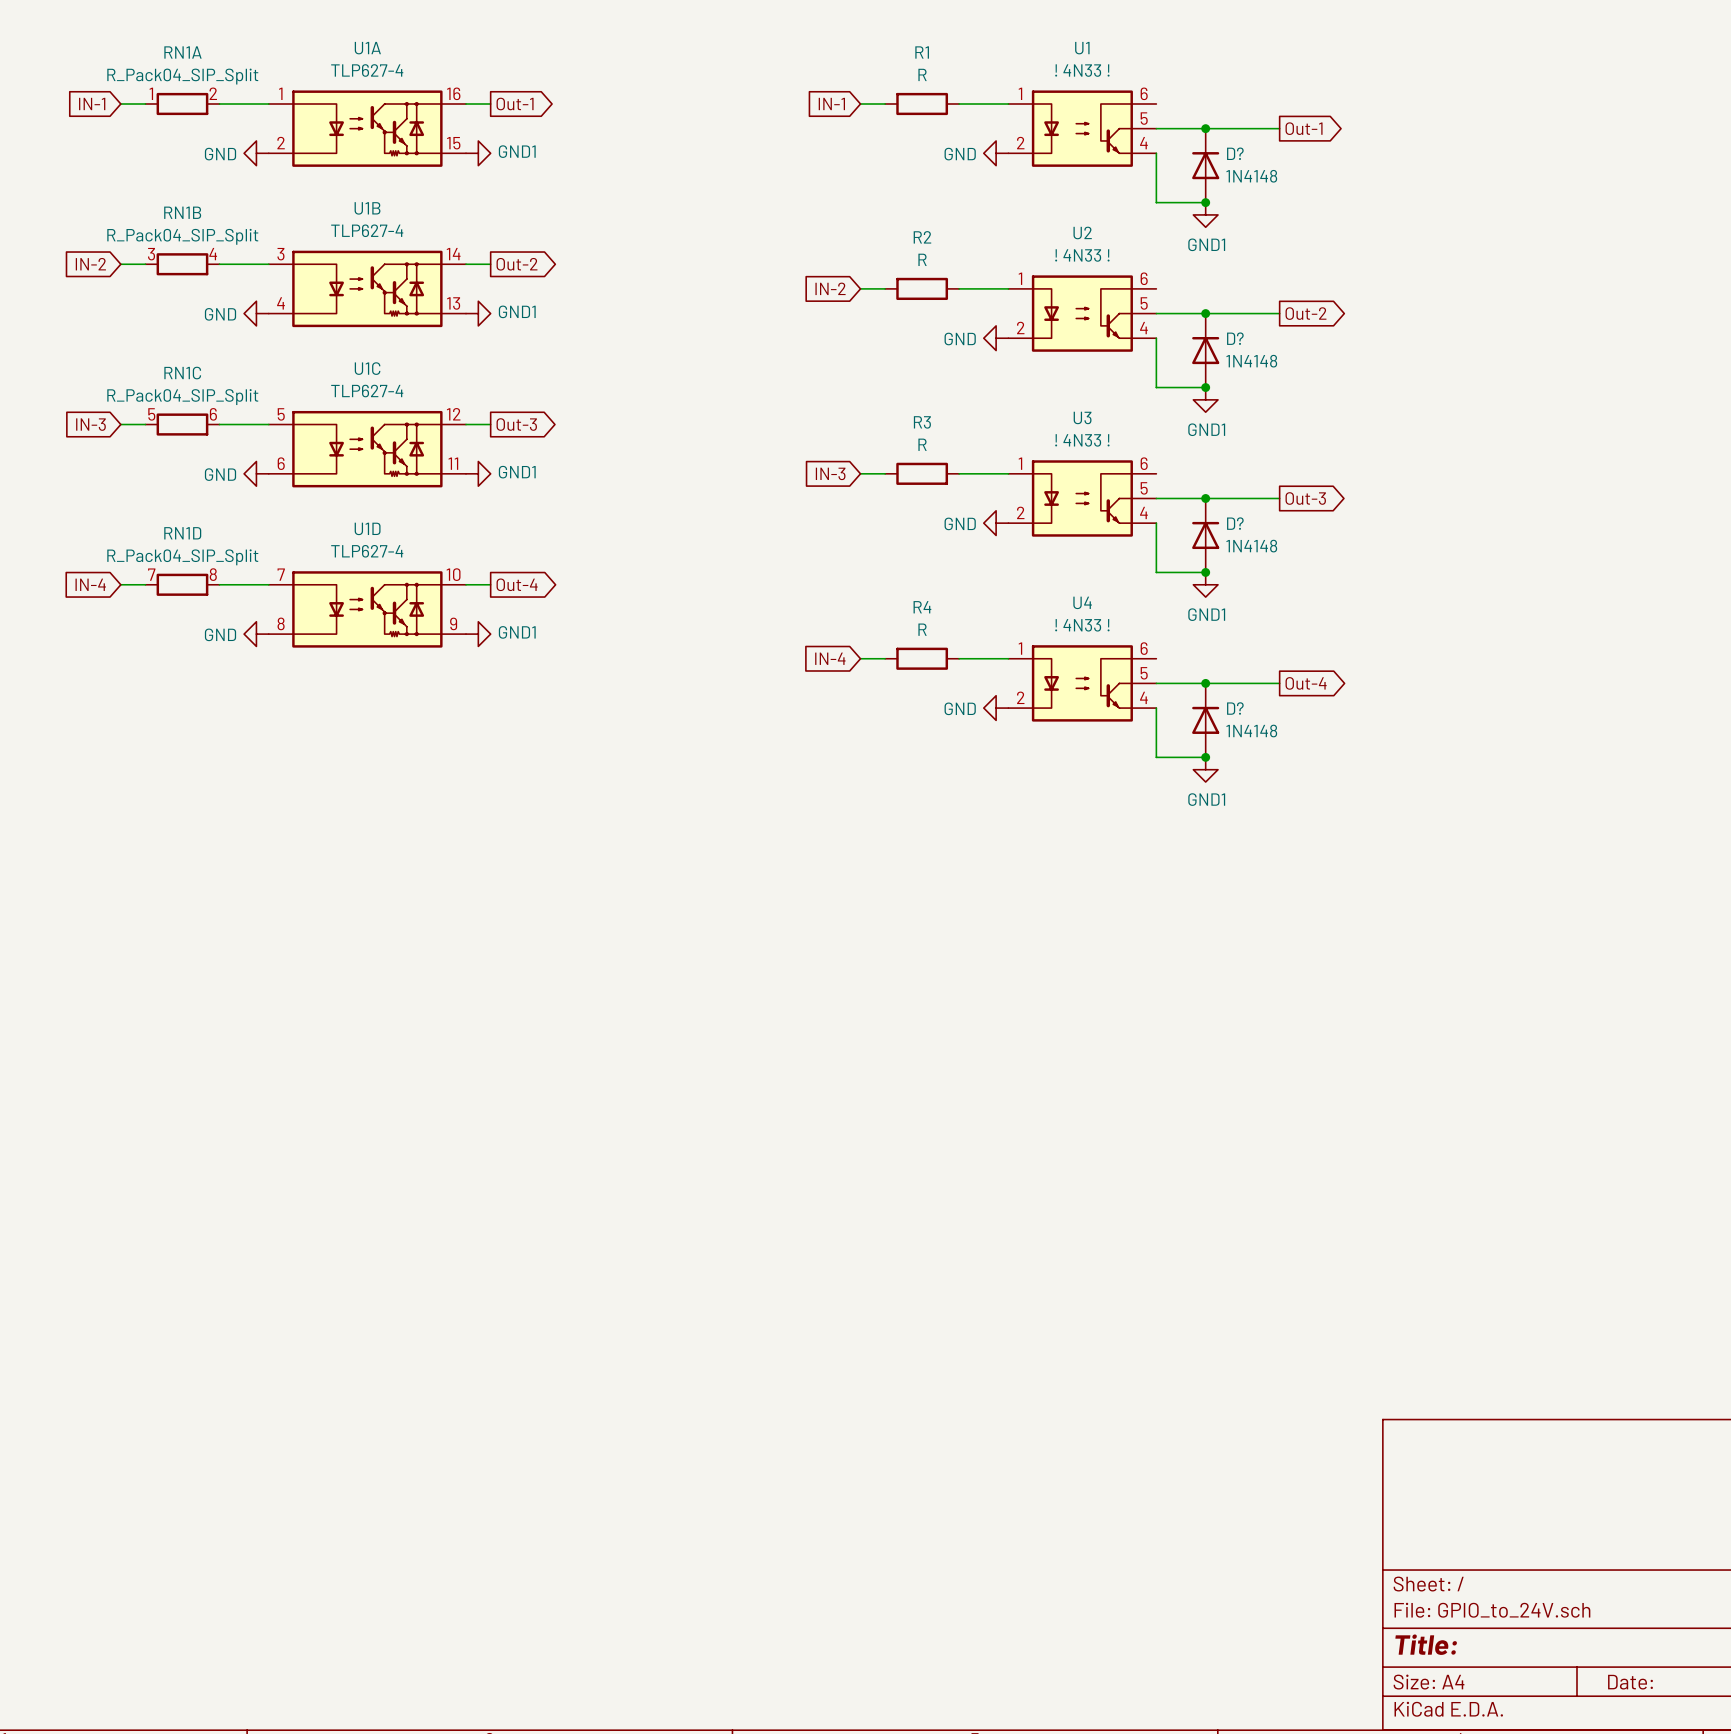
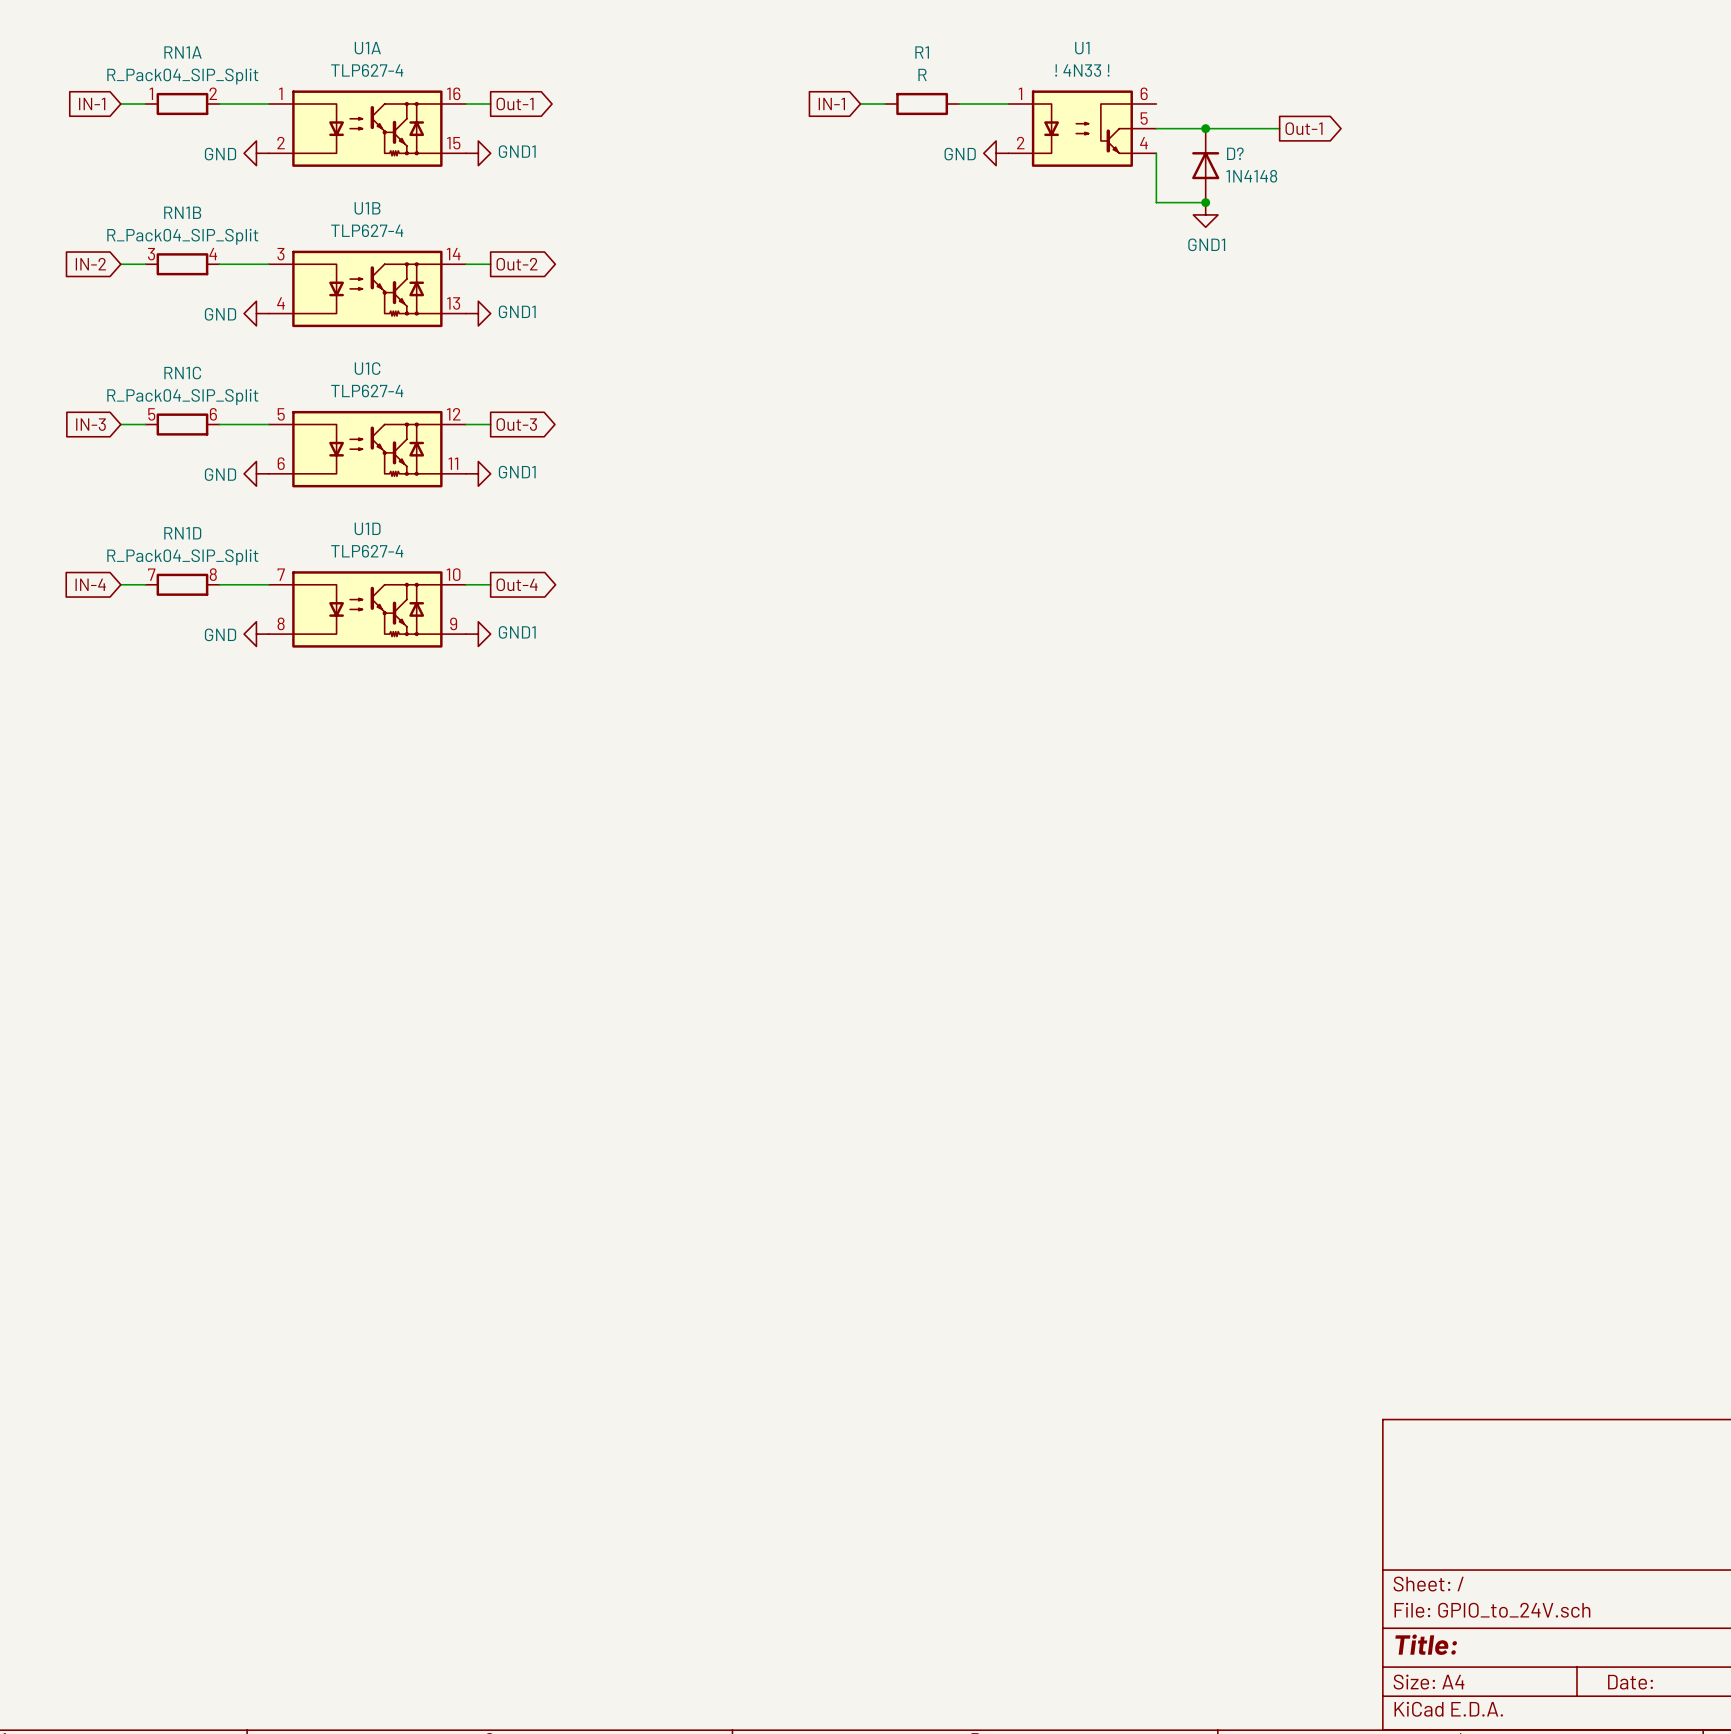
global label: IN-2 (830, 288) -> none
wire: (860, 288) (885, 288) -> none
R2: R (922, 288) -> none
wire: (959, 288) (1008, 288) -> none
U2: ! 4N33 ! (1082, 313) -> none
wire: (1156, 313) (1279, 313) -> none
junction: (1205, 313) -> none
global label: Out-2 (1305, 313) -> none
power symbol: GND (996, 338) -> none
wire: (1156, 338) (1156, 387) (1205, 387) -> none
D?: 1N4148 (1205, 350) -> none
junction: (1205, 387) -> none
power symbol: GND1 (1205, 399) -> none
global label: IN-3 (830, 473) -> none
wire: (860, 473) (885, 473) -> none
R3: R (922, 473) -> none
wire: (959, 473) (1008, 473) -> none
U3: ! 4N33 ! (1082, 498) -> none
wire: (1156, 498) (1279, 498) -> none
junction: (1205, 498) -> none
global label: Out-3 (1305, 498) -> none
power symbol: GND (996, 523) -> none
wire: (1156, 523) (1156, 572) (1205, 572) -> none
D?: 1N4148 (1205, 535) -> none
junction: (1205, 572) -> none
power symbol: GND1 (1205, 584) -> none
global label: IN-4 (830, 658) -> none
wire: (860, 658) (885, 658) -> none
R4: R (922, 658) -> none
wire: (959, 658) (1008, 658) -> none
U4: ! 4N33 ! (1082, 683) -> none
wire: (1156, 683) (1279, 683) -> none
junction: (1205, 683) -> none
global label: Out-4 (1306, 683) -> none
power symbol: GND (996, 708) -> none
wire: (1156, 708) (1156, 757) (1205, 757) -> none
D?: 1N4148 (1205, 720) -> none
junction: (1205, 757) -> none
power symbol: GND1 (1205, 769) -> none

